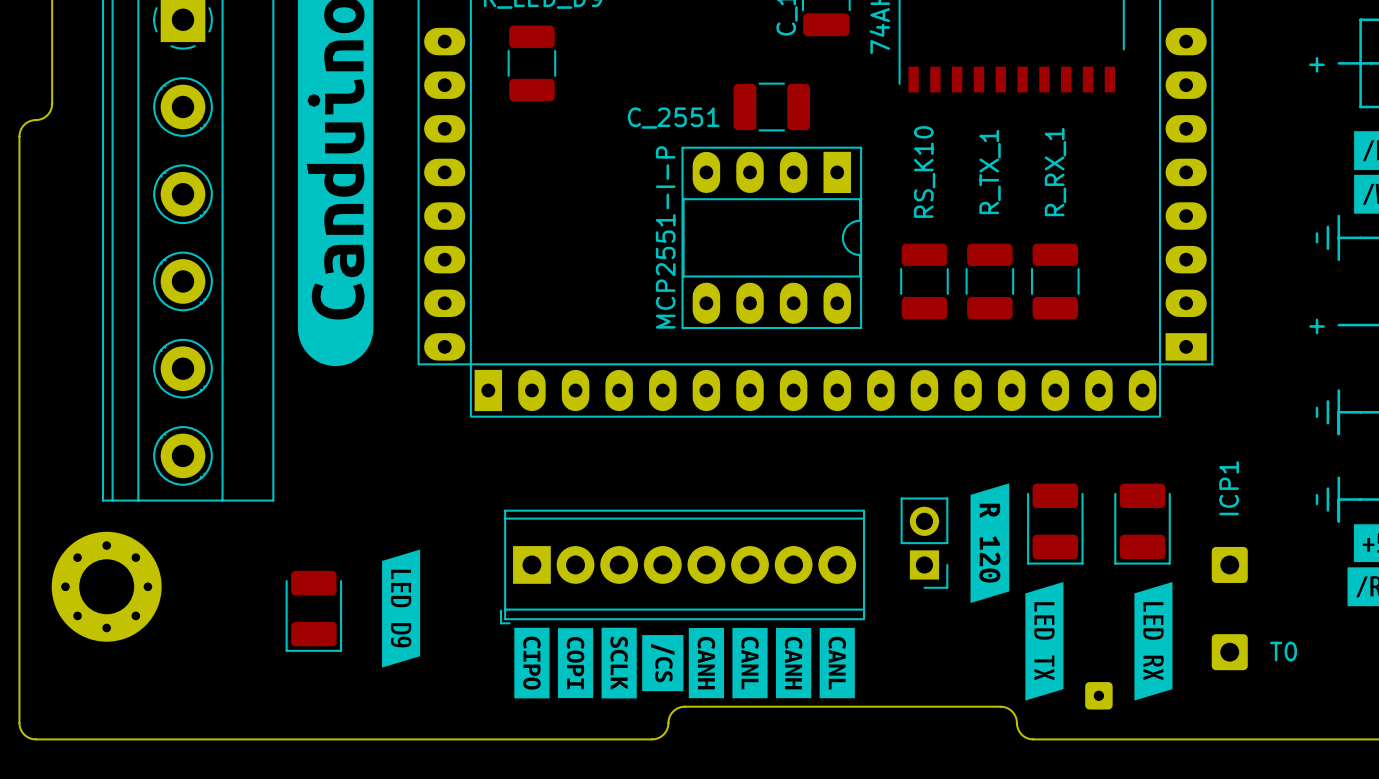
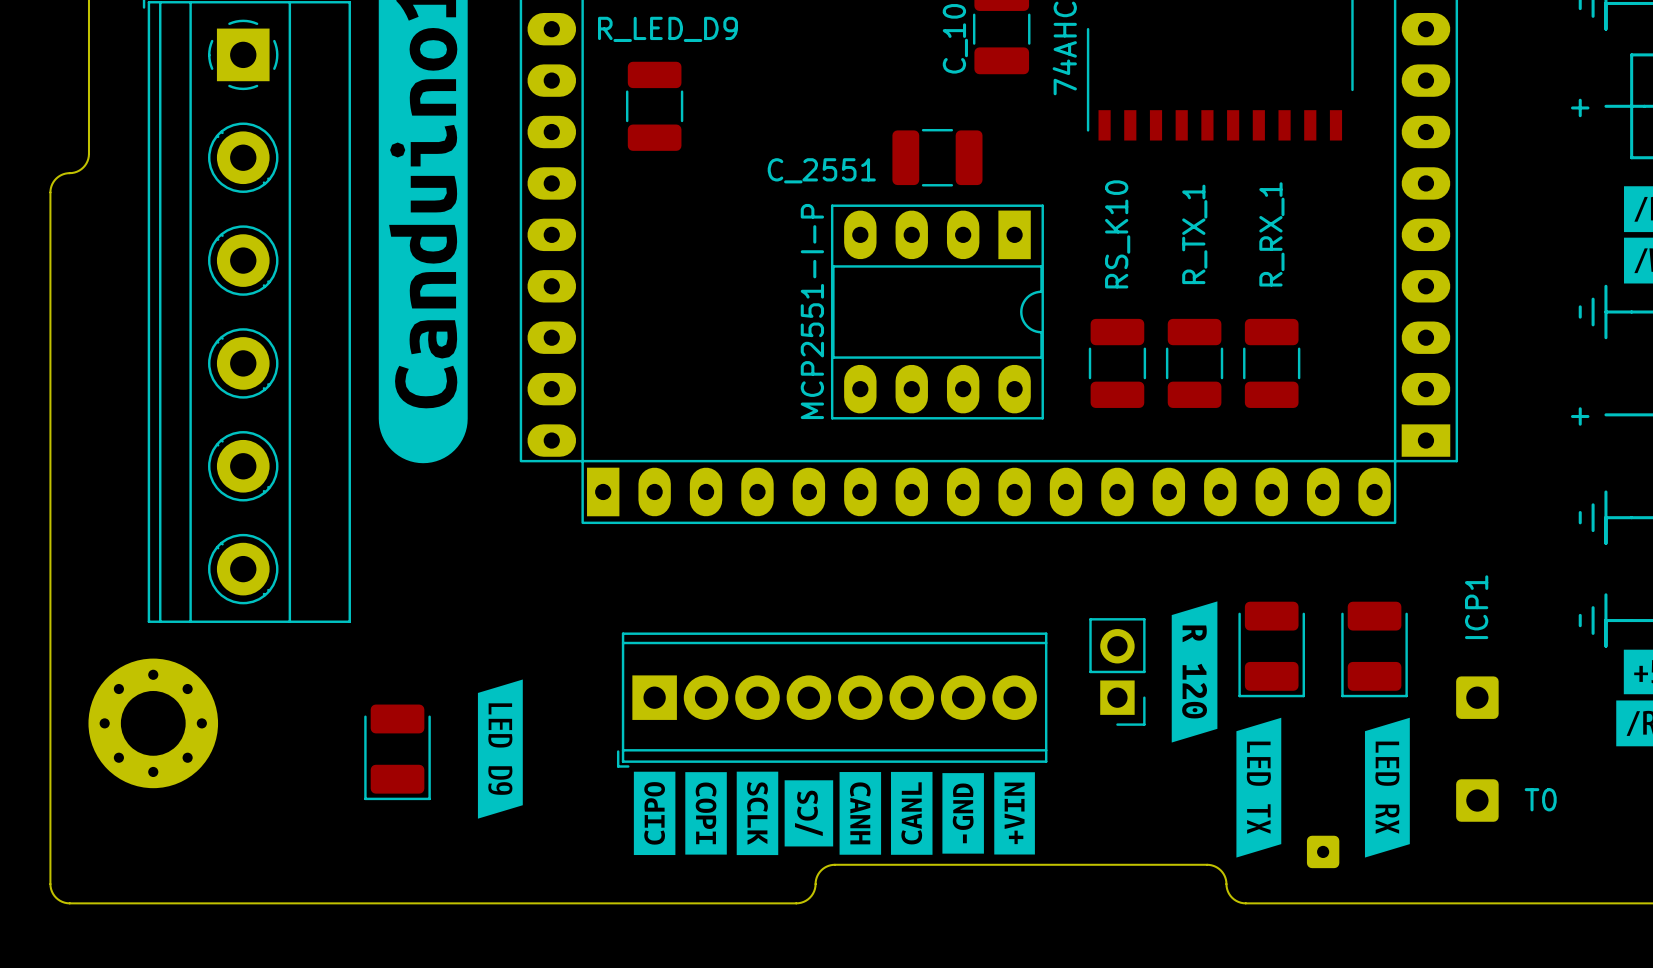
drawing shape: [514, 627, 550, 699] -> [633, 771, 676, 856]
drawing shape: [732, 627, 768, 699] -> [890, 771, 933, 855]
drawing shape: [819, 627, 855, 699] -> [994, 772, 1035, 855]
drawing shape: [776, 628, 812, 699] -> [942, 773, 984, 854]
drawing shape: [642, 635, 684, 692] -> [784, 780, 834, 847]

